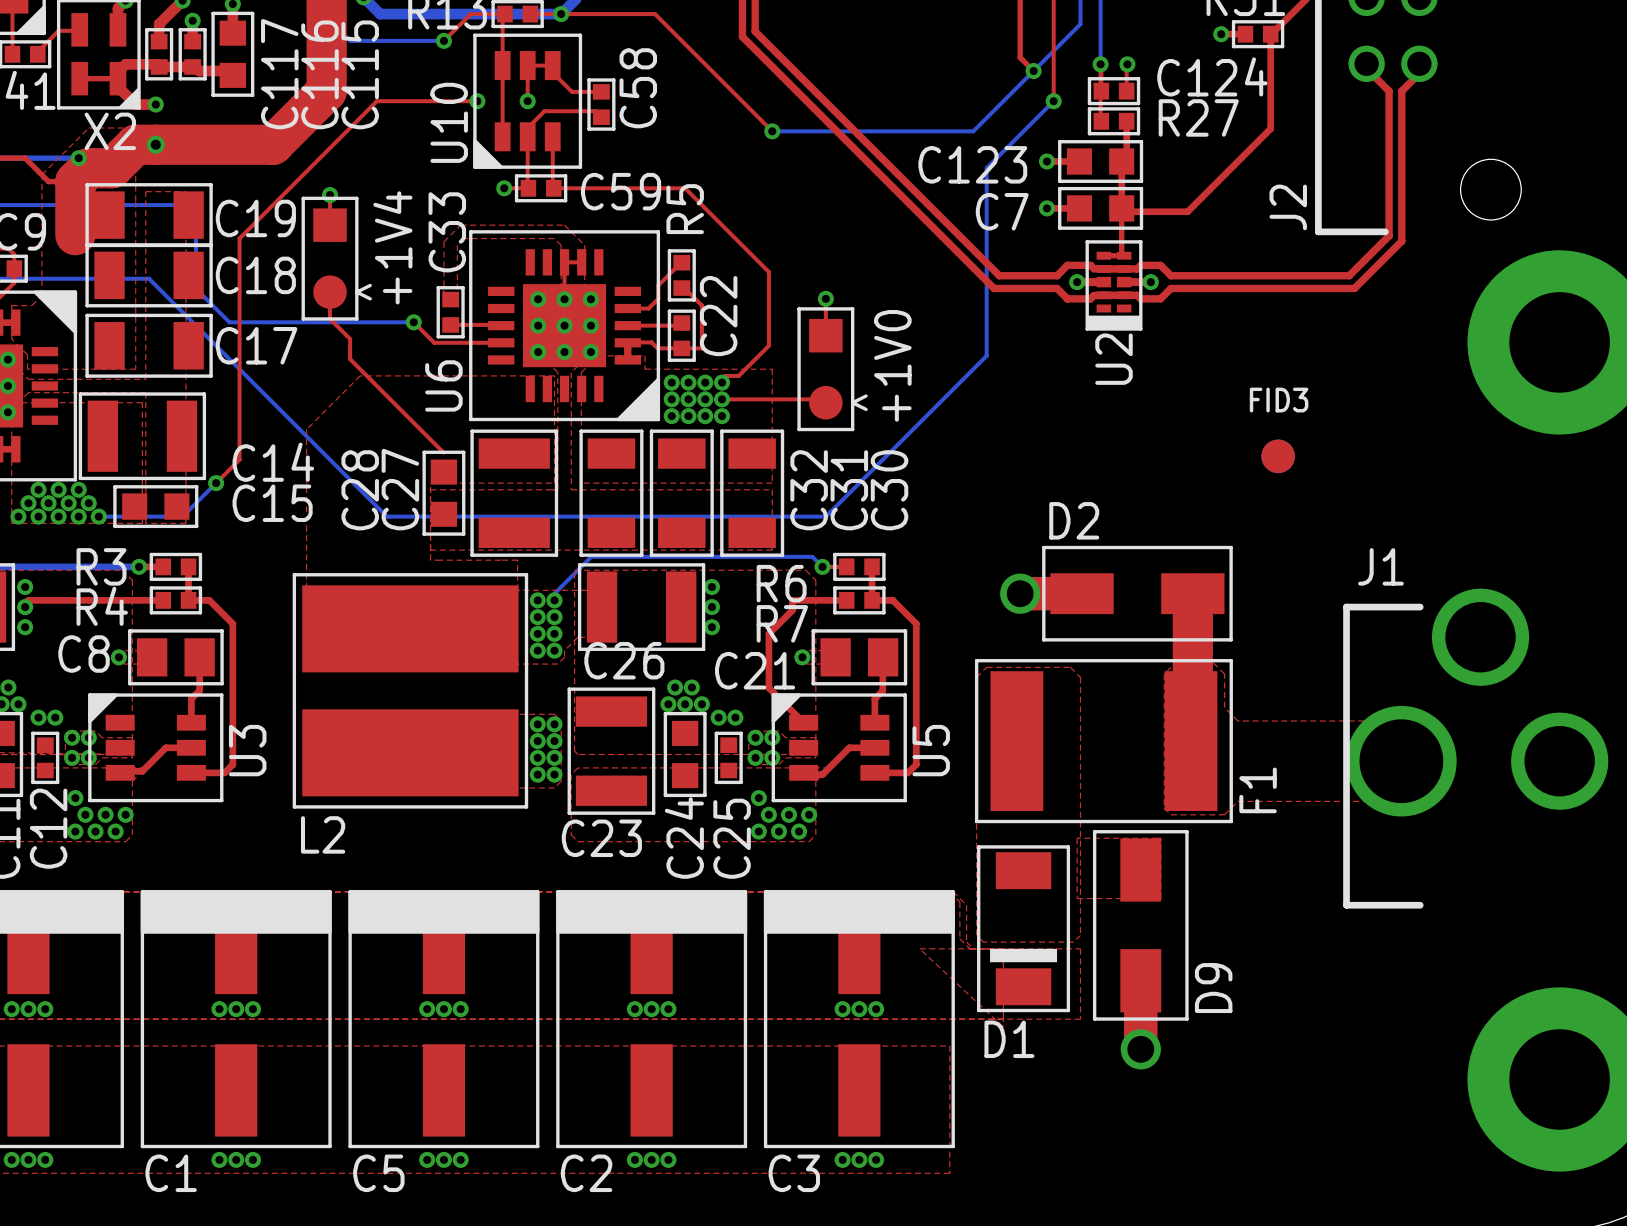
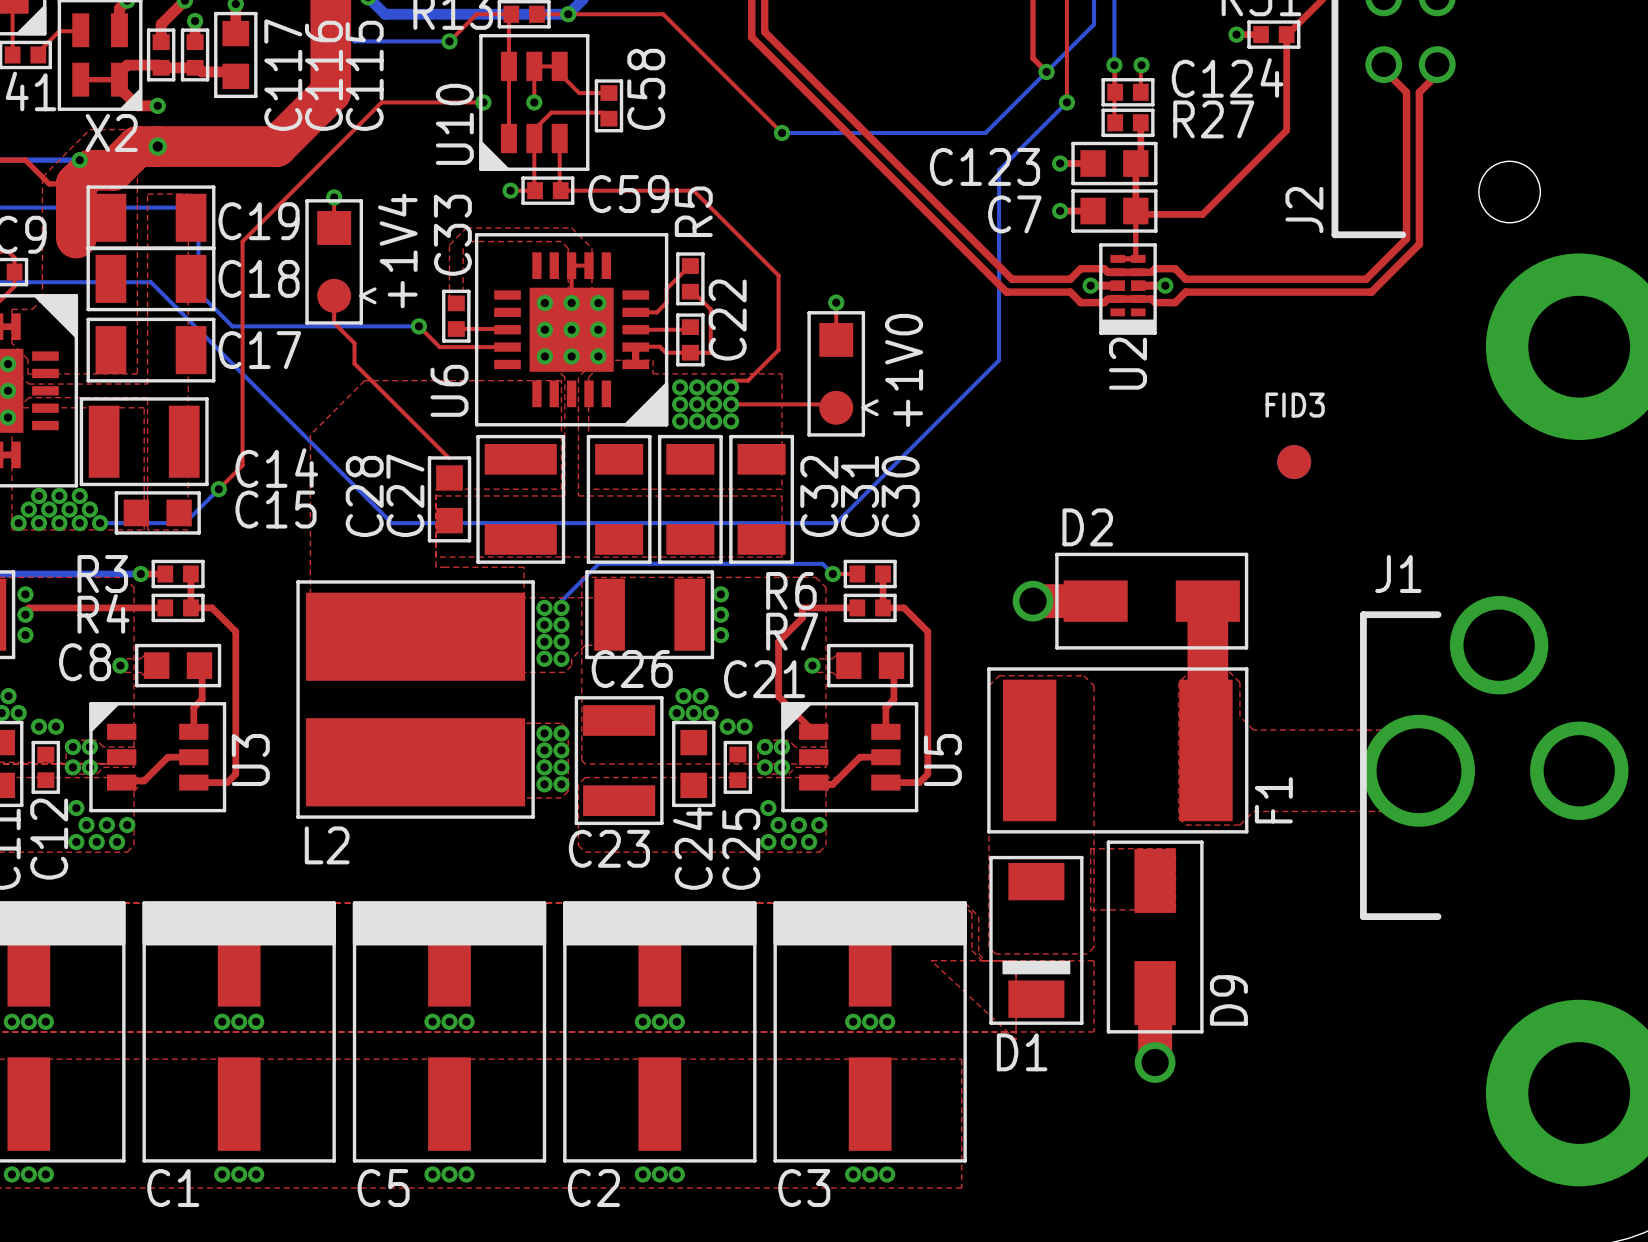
C8 footprint: [128, 629, 224, 686] -> [135, 643, 222, 688]
C21 footprint: [811, 629, 908, 686] -> [827, 643, 914, 688]

